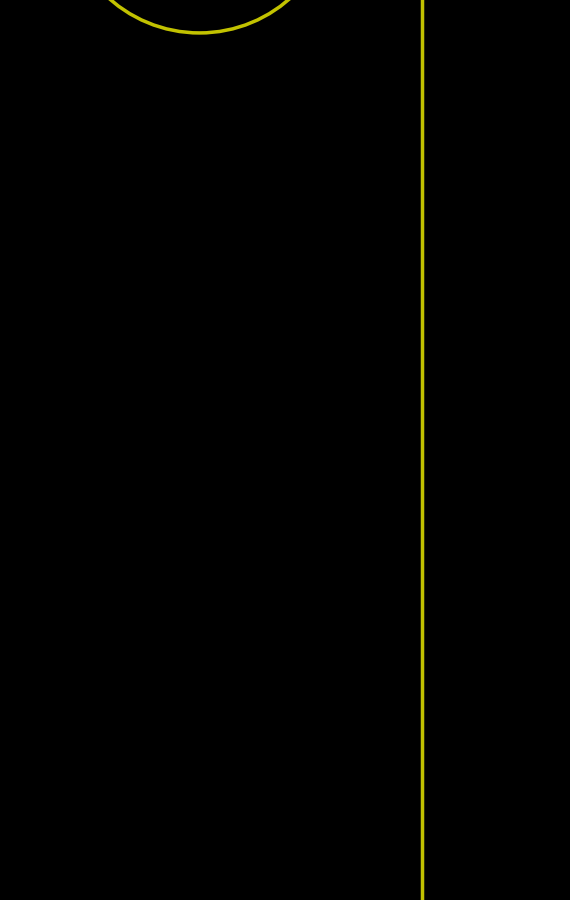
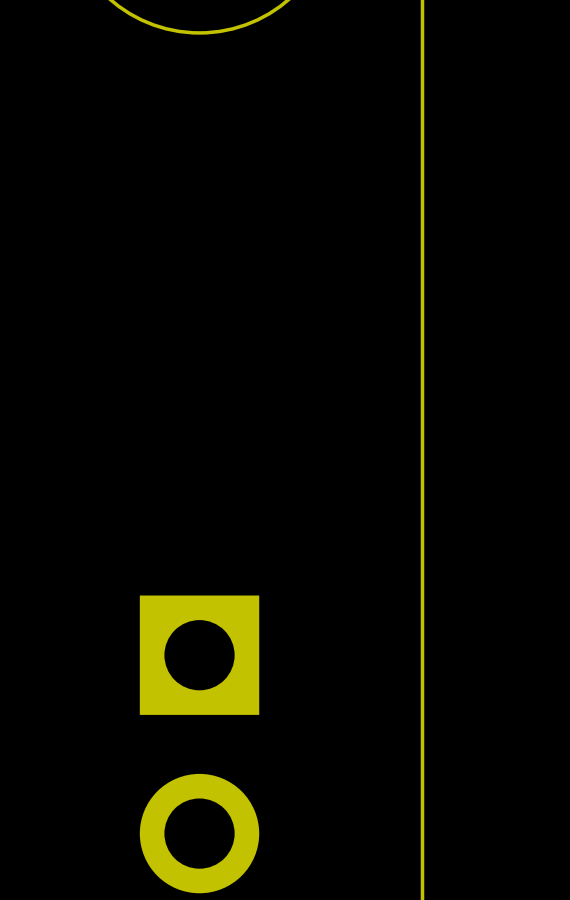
part: none -> (199, 744)

